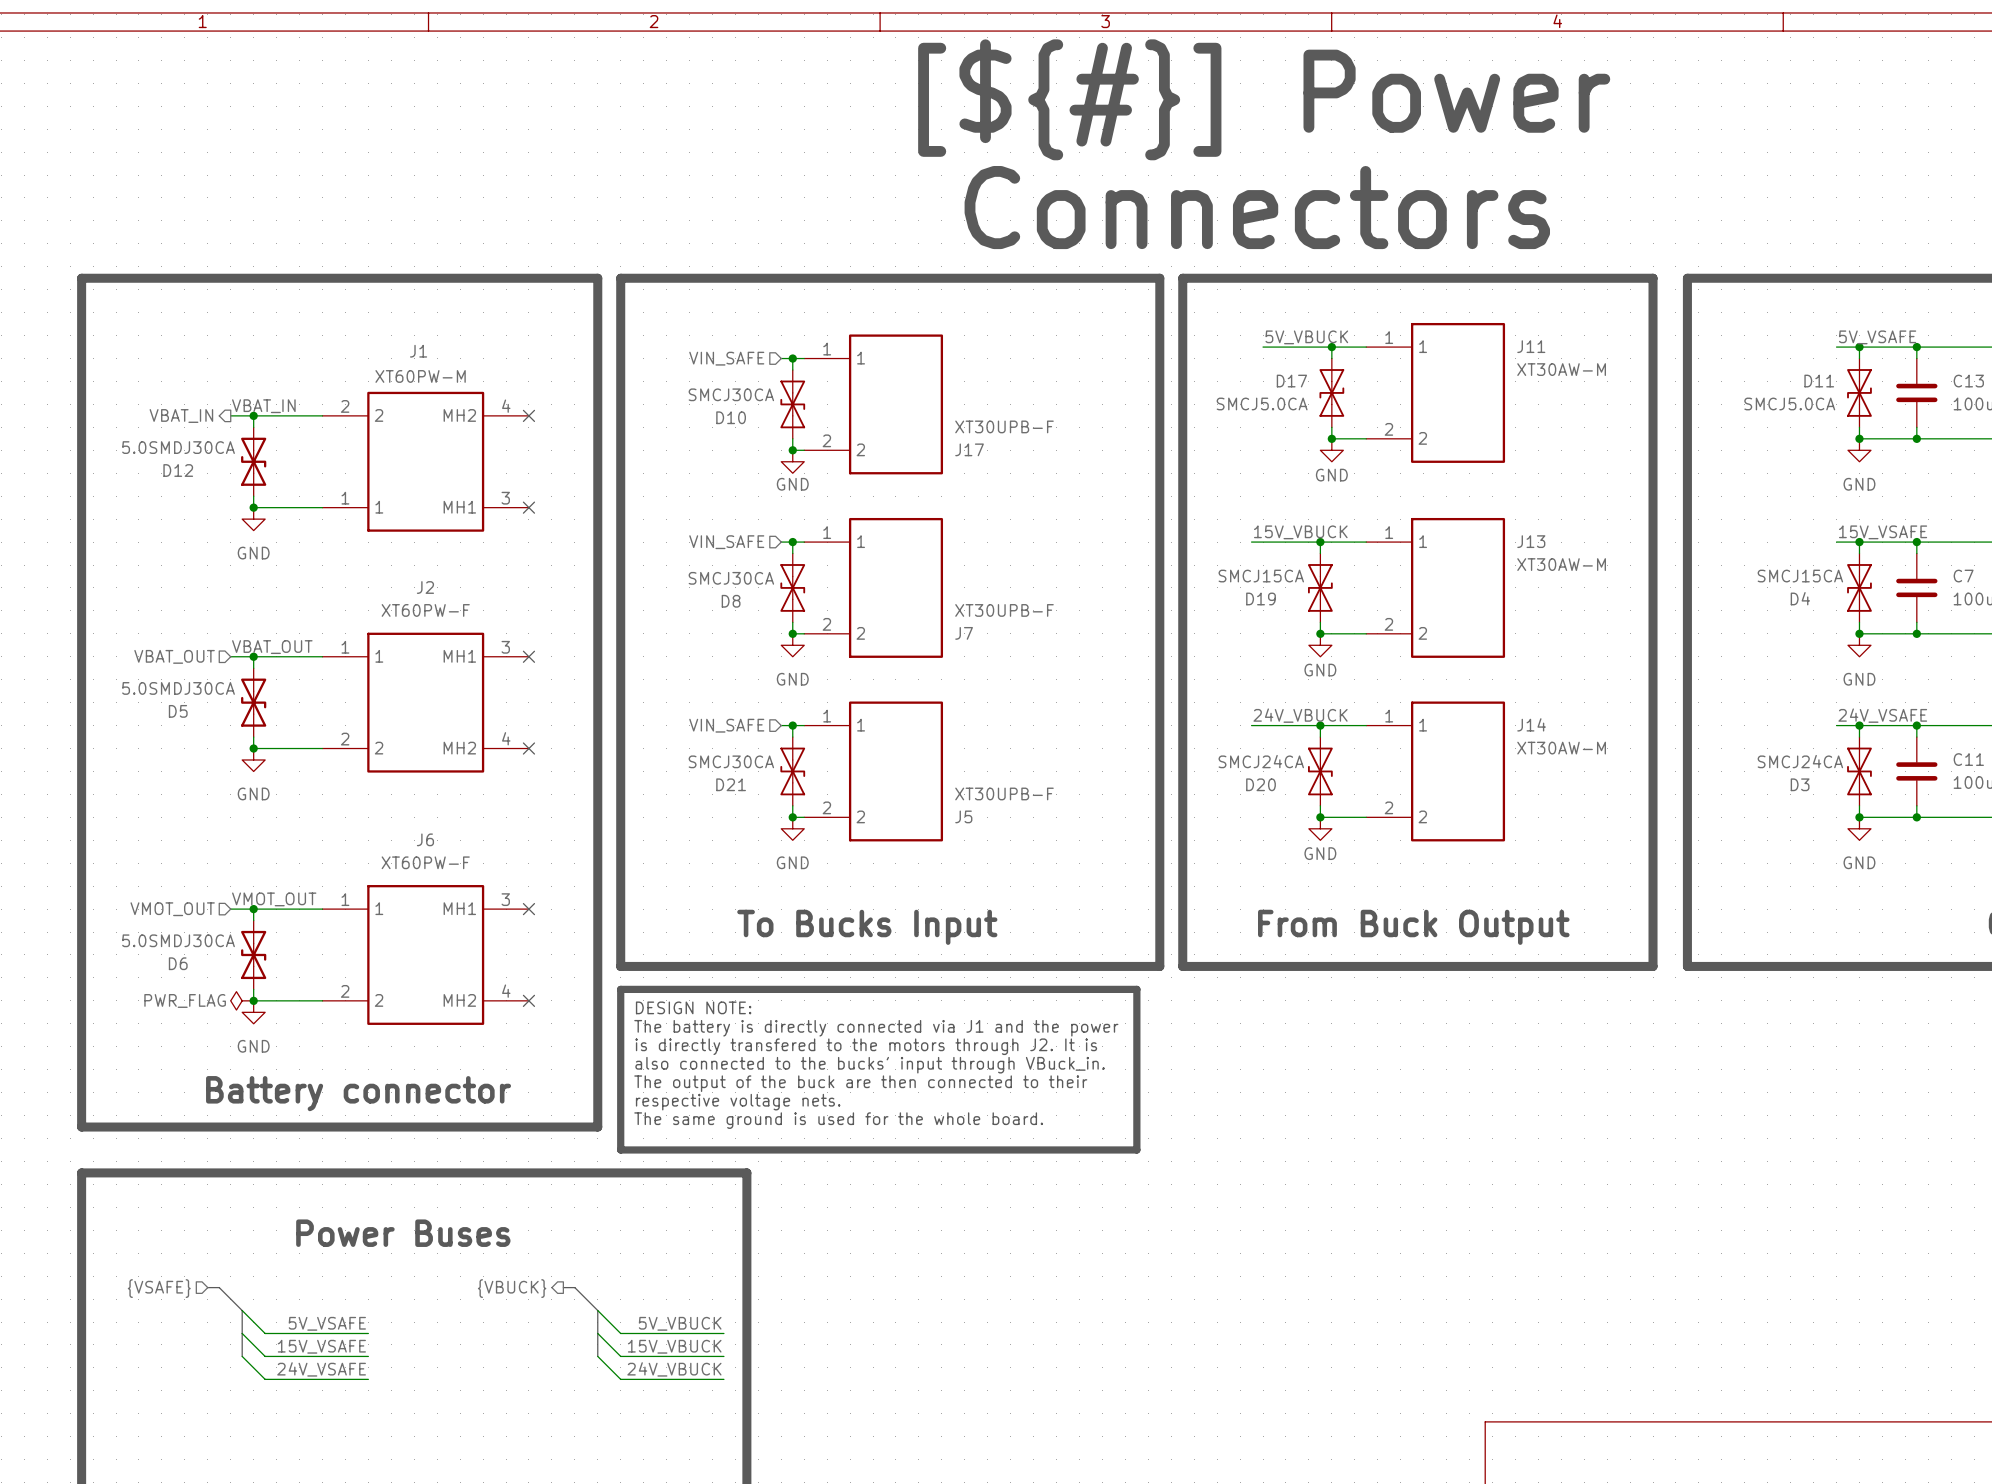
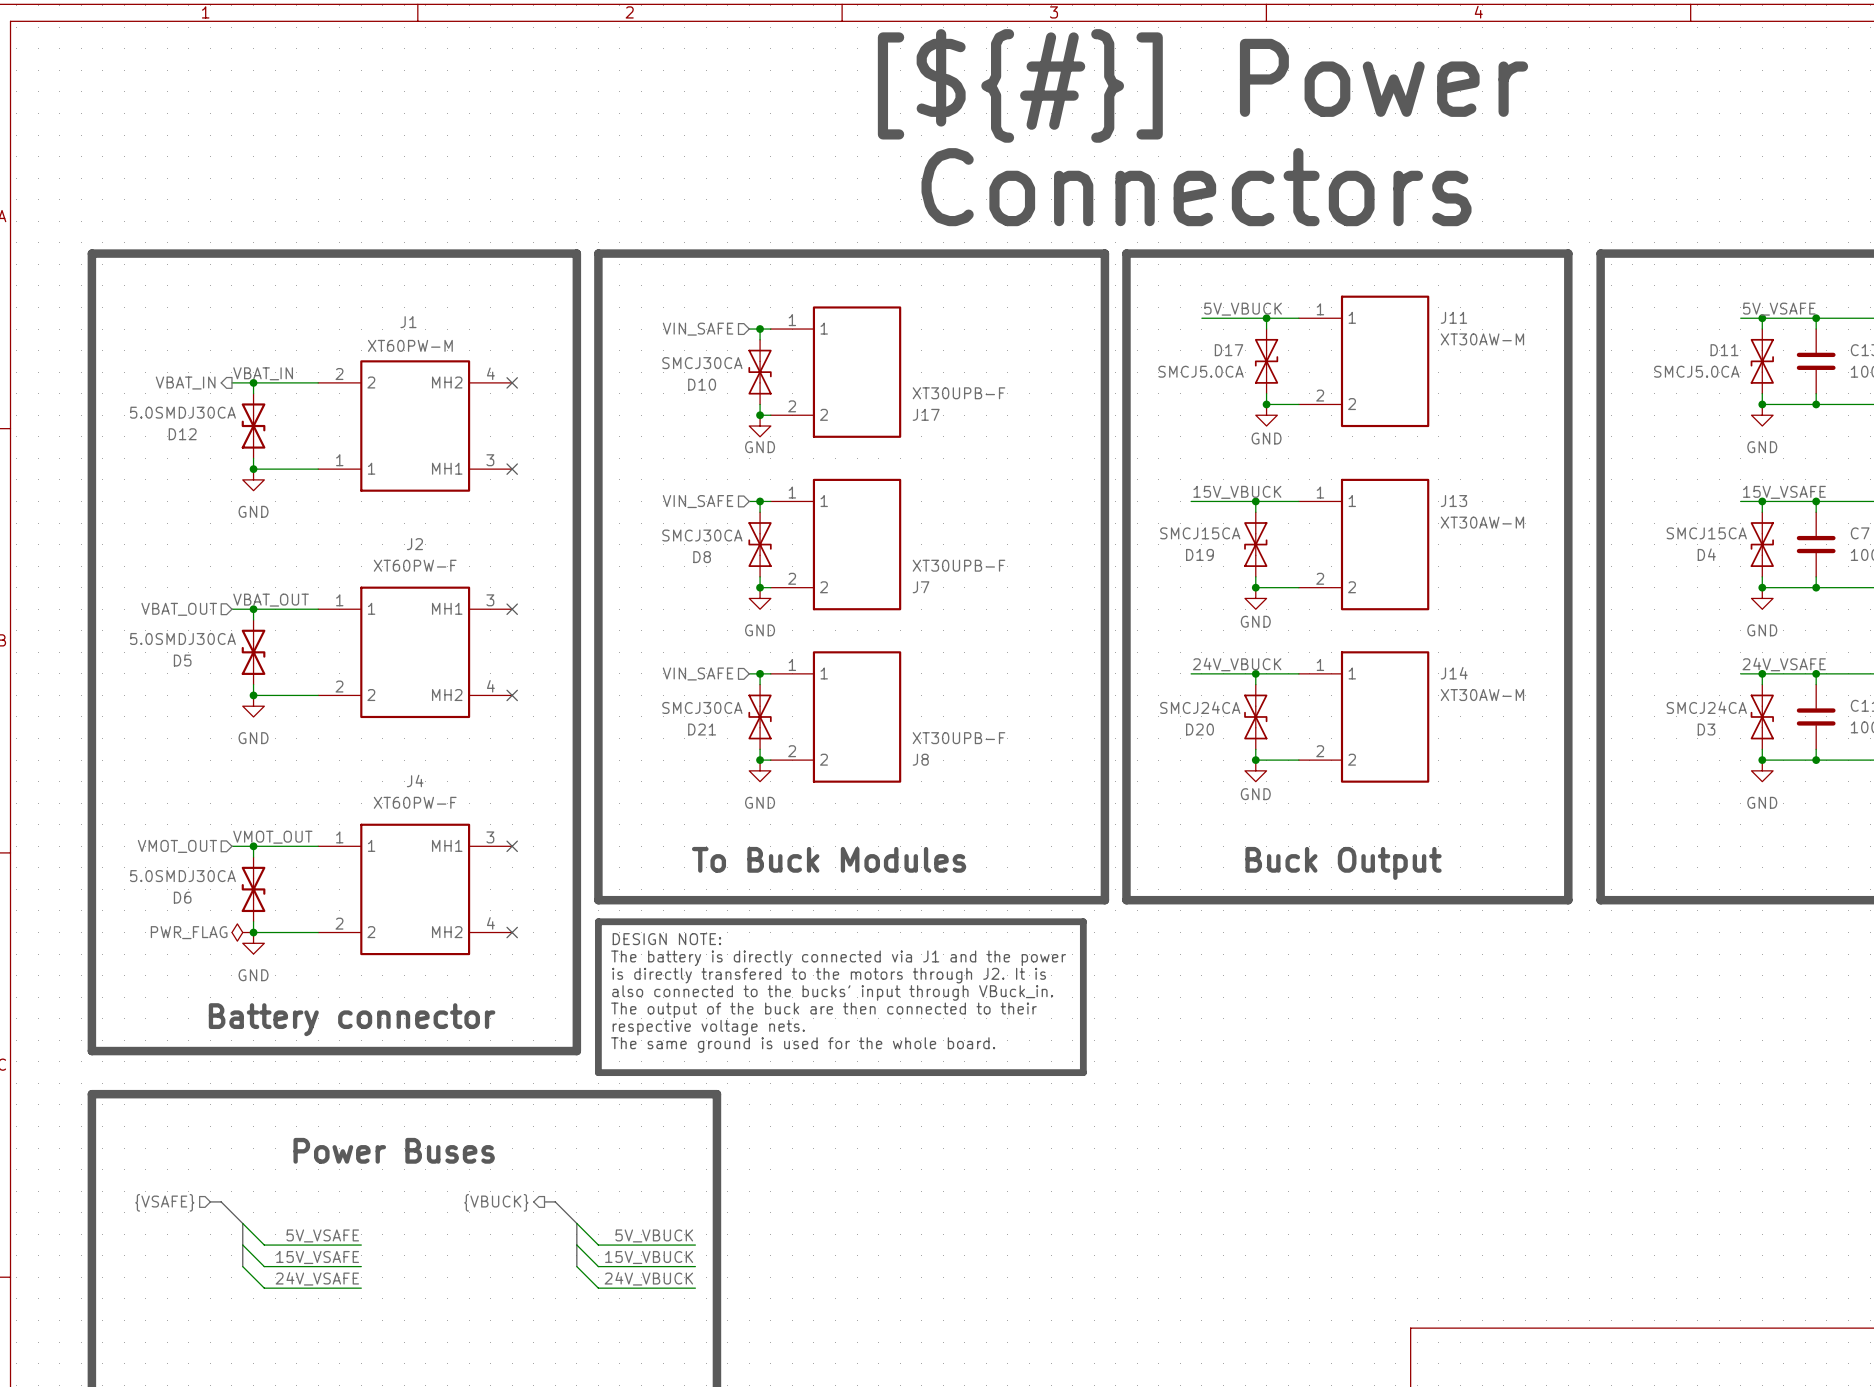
J5 name: J5 (963, 816) -> J8 (920, 759)
J6 name: J6 (425, 839) -> J4 (415, 780)
text: To Bucks Input (867, 927) -> To Buck Modules (829, 859)
text: From Buck Output (1413, 927) -> Buck Output (1343, 863)

